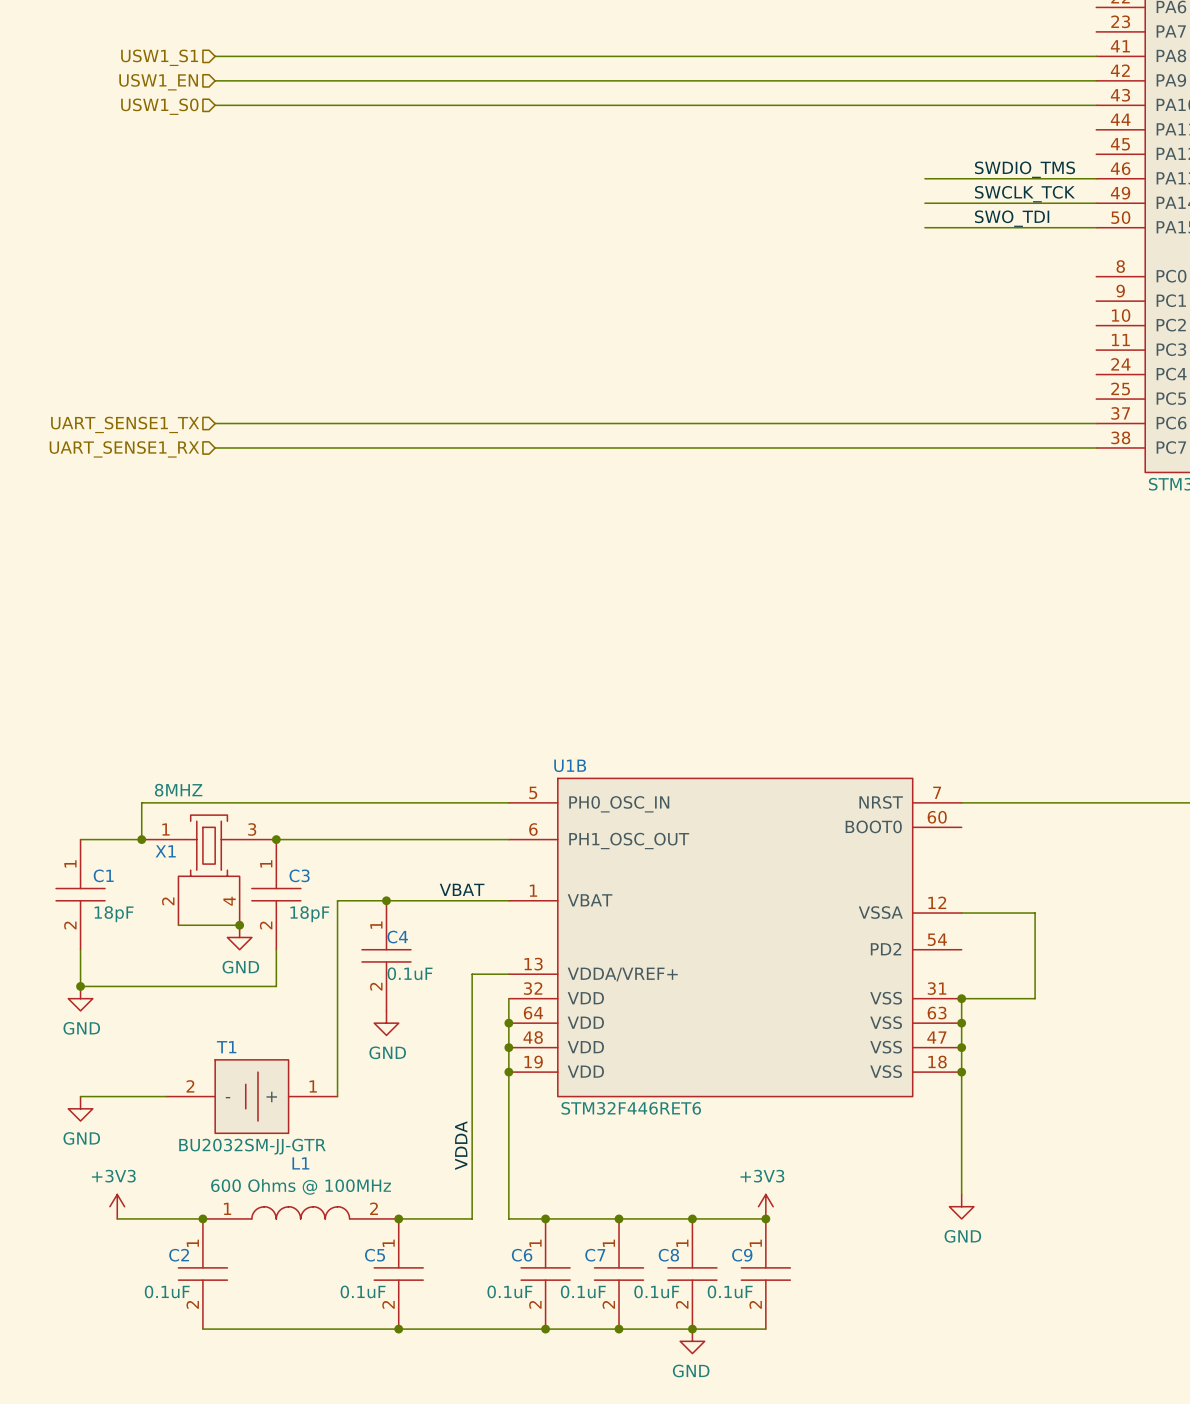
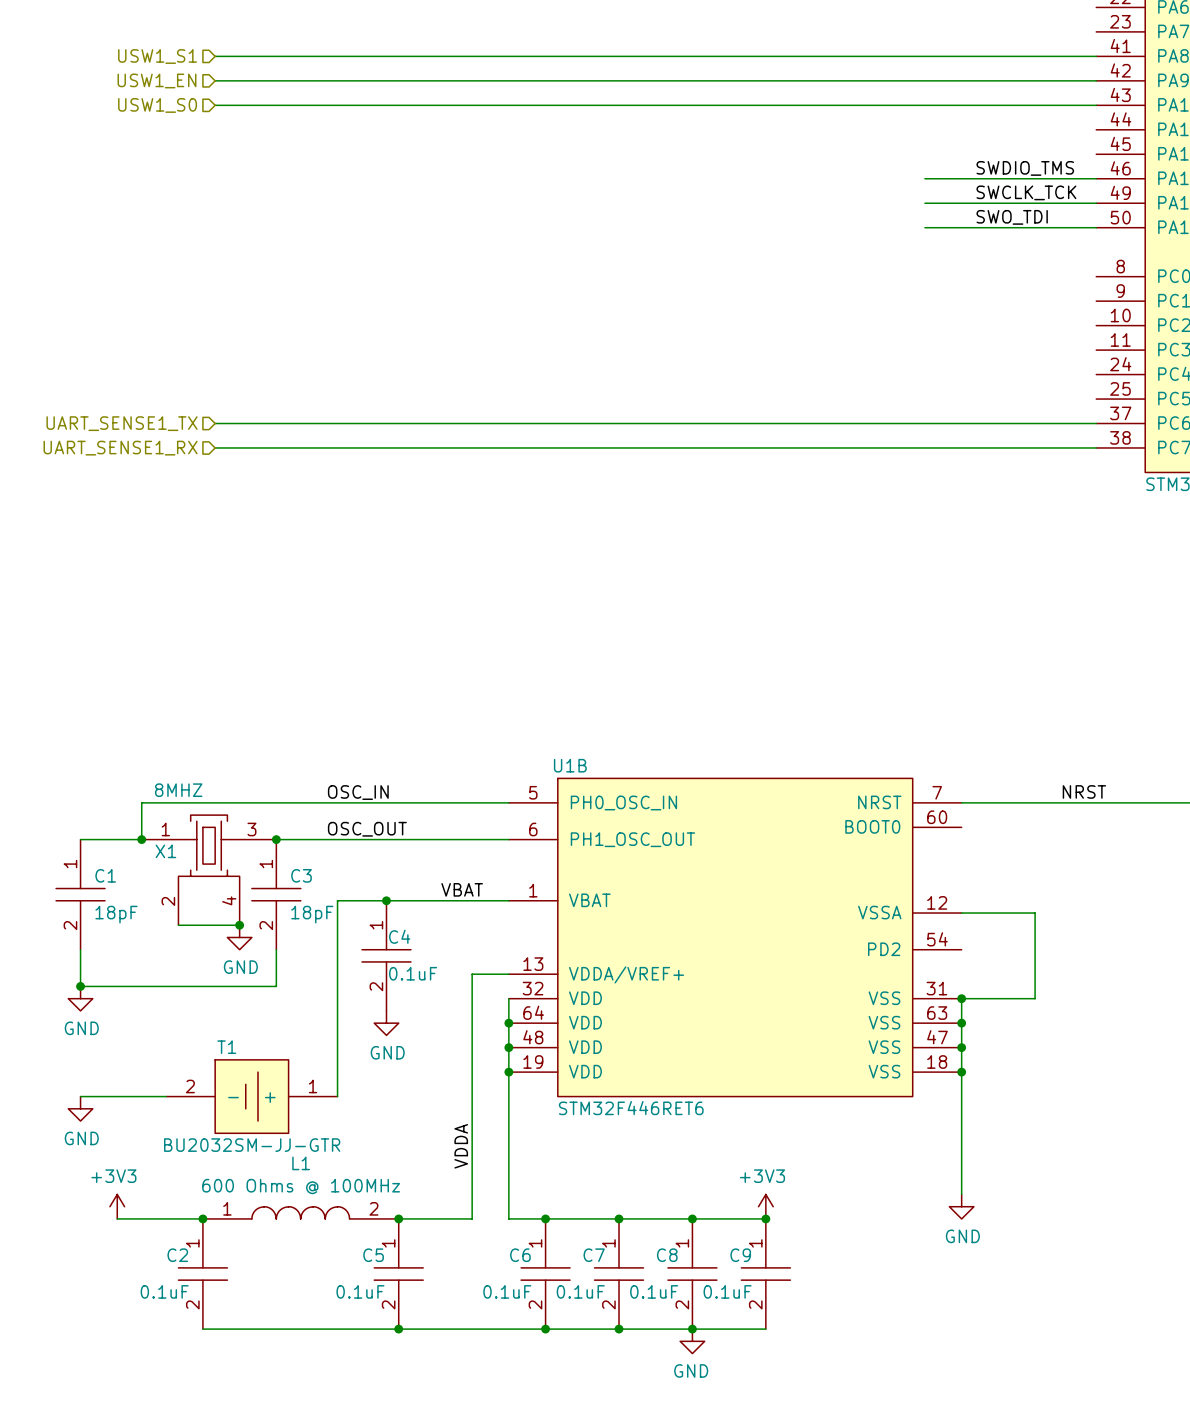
label: none -> NRST (1084, 791)
label: none -> OSC_IN (358, 792)
label: none -> OSC_OUT (367, 829)

